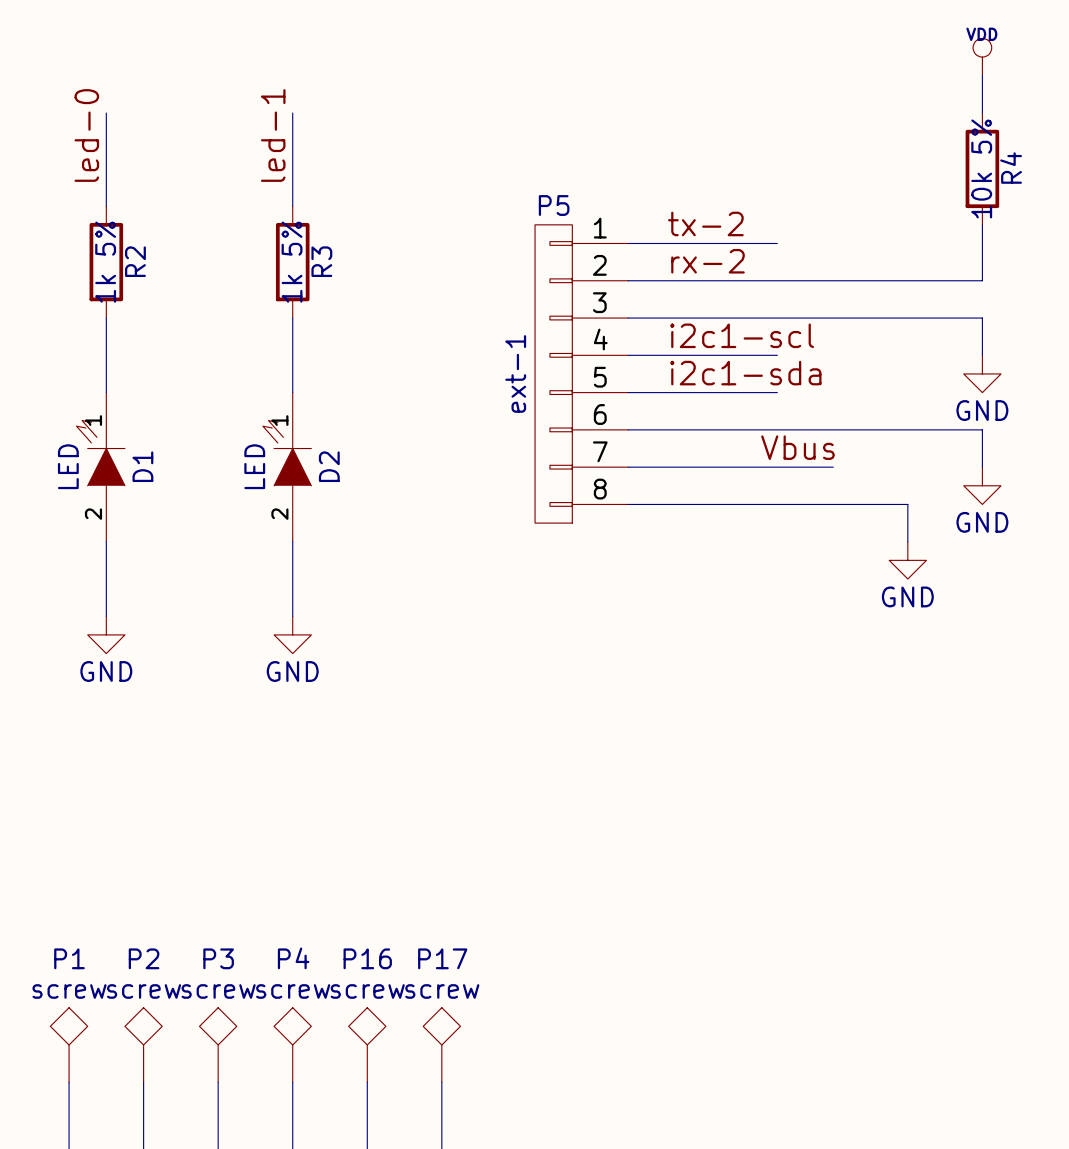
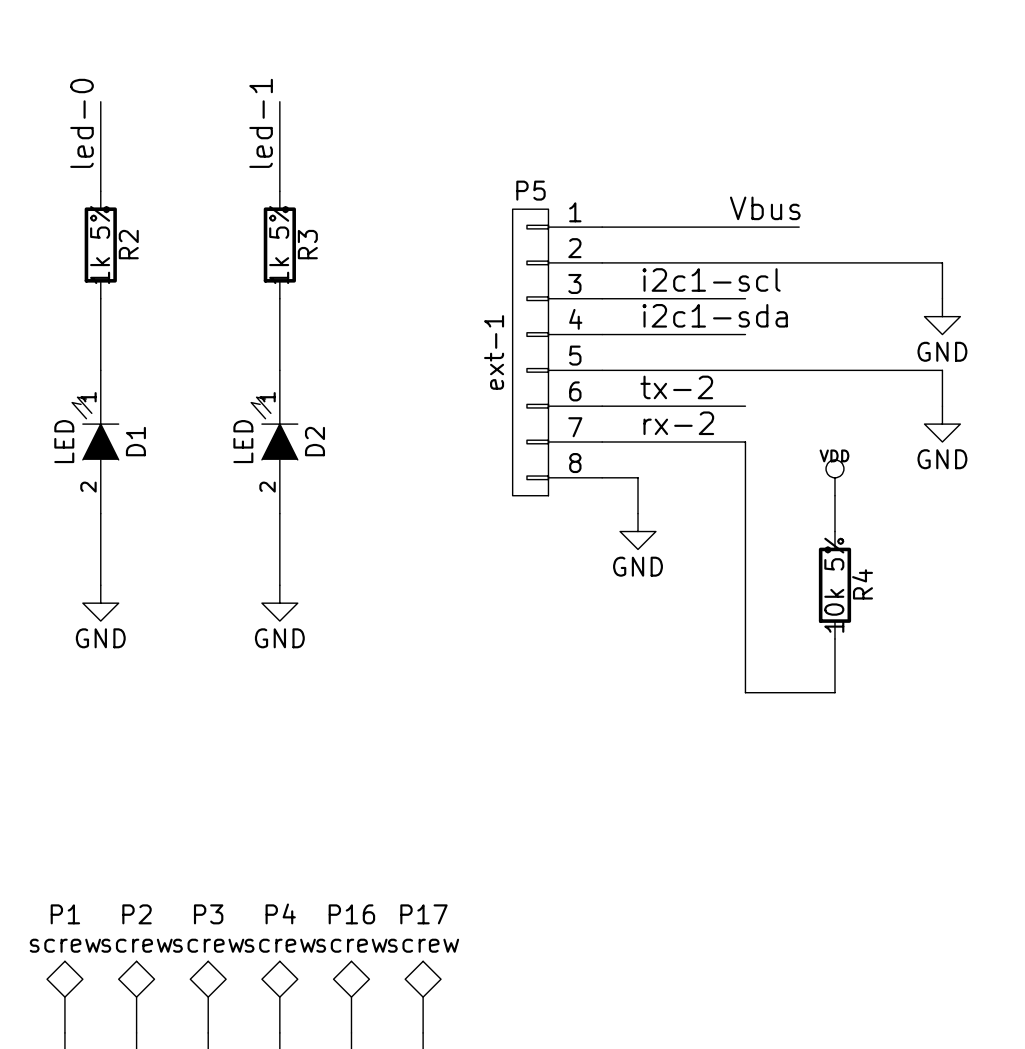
power symbol: VDD (982, 57) -> none
wire: (982, 75) (982, 113) -> none
R4 position: (982, 168) -> (834, 585)
label position: tx-2 (705, 223) -> tx-2 (676, 387)
wire: (982, 224) (982, 280) -> (942, 298) (942, 262)
wire: none -> (745, 227) (799, 227)
label position: rx-2 (708, 261) -> rx-2 (678, 423)
label: none -> i2c1-scl (711, 279)
wire: (777, 318) (982, 318) (982, 355) -> none
label: i2c1-scl (742, 335) -> i2c1-sda (715, 315)
power symbol: none -> GND (942, 316)
label: i2c1-sda (745, 373) -> none
power symbol: GND (982, 373) -> none
wire: (777, 429) (982, 429) (982, 467) -> (745, 370) (942, 370) (942, 406)
label position: Vbus (798, 447) -> Vbus (765, 208)
power symbol: none -> GND (942, 424)
wire: (777, 467) (833, 467) -> (745, 441) (745, 692) (834, 692) (834, 638)
power symbol: GND (982, 485) -> none
wire: (665, 504) (907, 504) (907, 541) -> (638, 477) (638, 513)
power symbol: none -> VDD (834, 477)
wire: none -> (834, 495) (834, 531)
power symbol: none -> GND (638, 531)
power symbol: GND (907, 560) -> none

